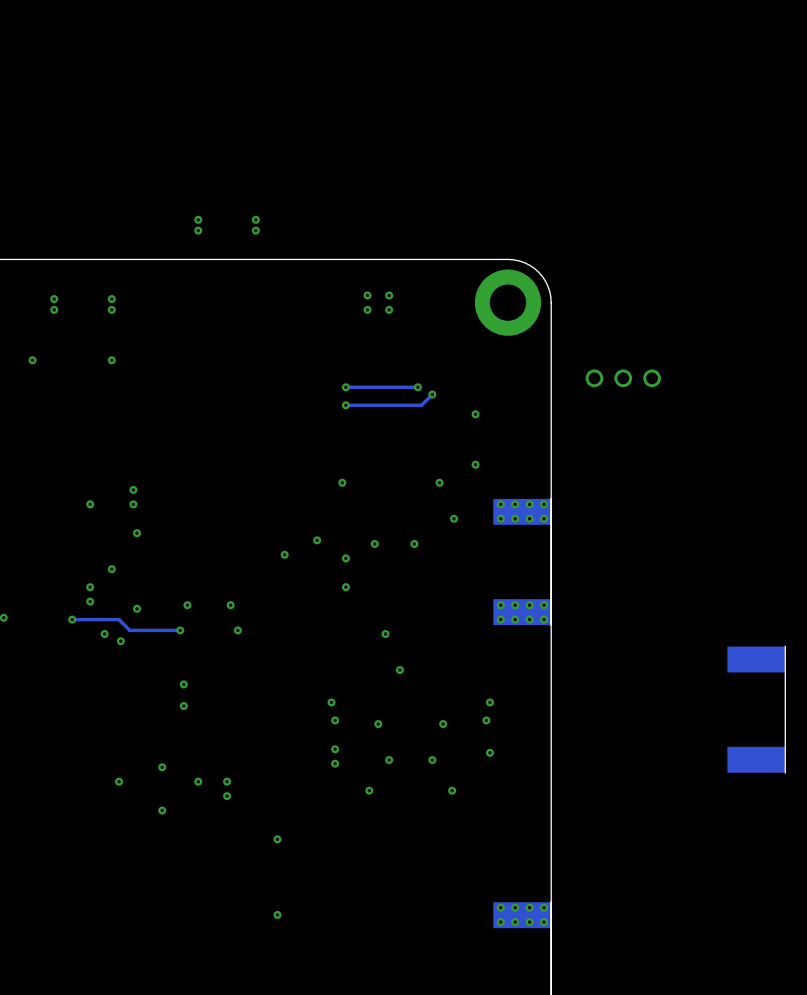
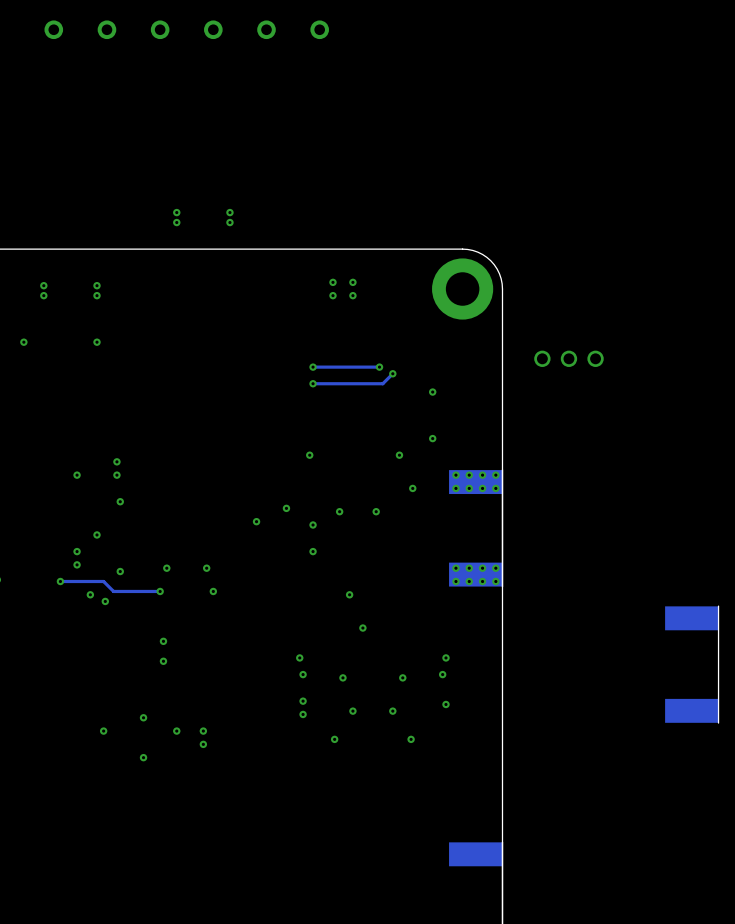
part: none -> (53, 29)
part: none -> (106, 29)
part: none -> (160, 29)
part: none -> (213, 29)
part: none -> (266, 29)
part: none -> (319, 29)
via: (277, 839) -> none
via: (500, 907) -> none
via: (515, 907) -> none
via: (529, 907) -> none
via: (544, 907) -> none
via: (277, 914) -> none
via: (500, 922) -> none
via: (515, 922) -> none
via: (529, 922) -> none
via: (544, 922) -> none

